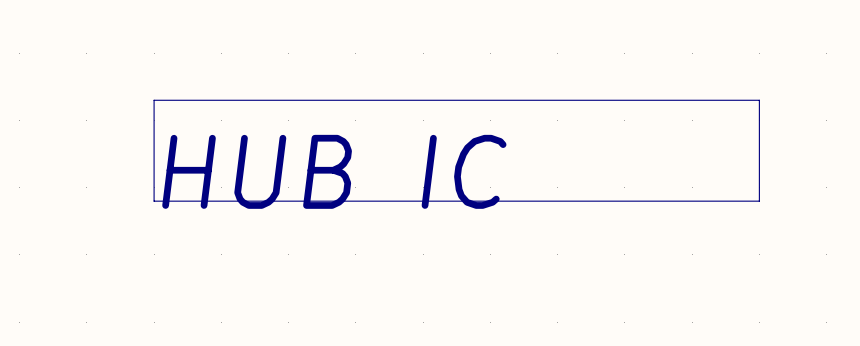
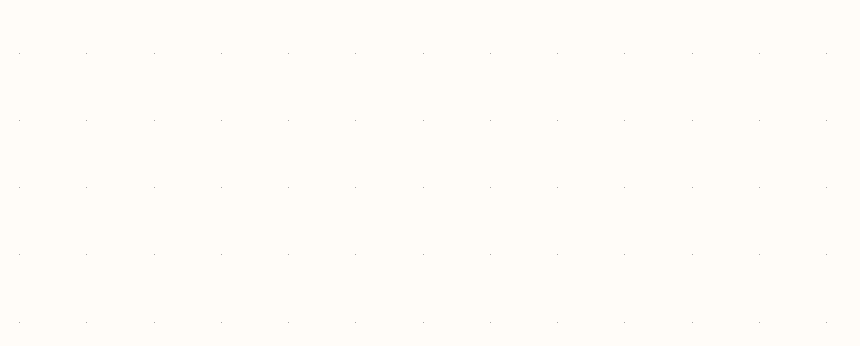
line: (154, 100) (759, 100) (759, 201) (154, 201) (154, 100) -> none
text: HUB IC (334, 171) -> none

